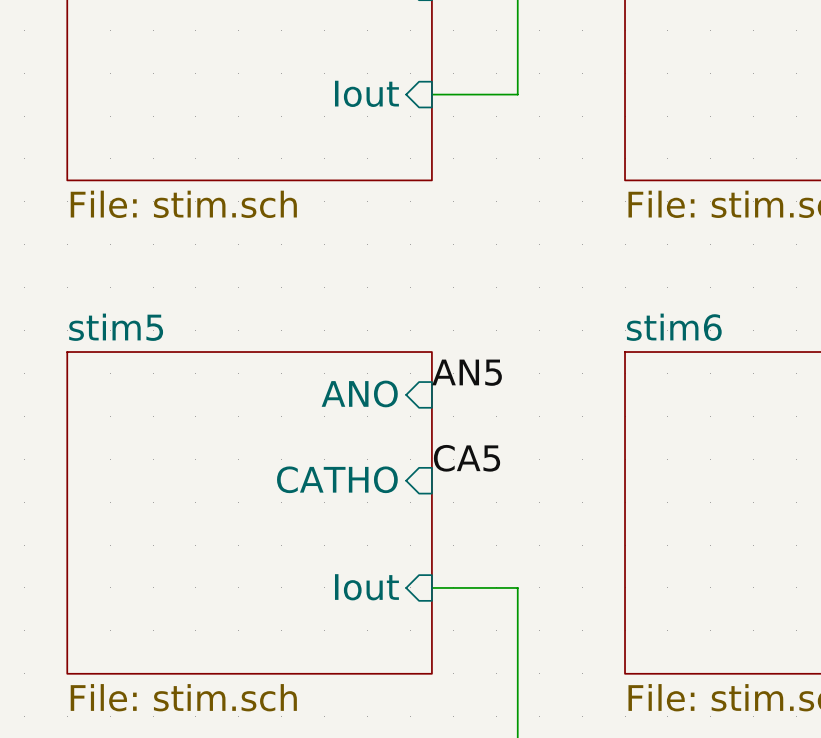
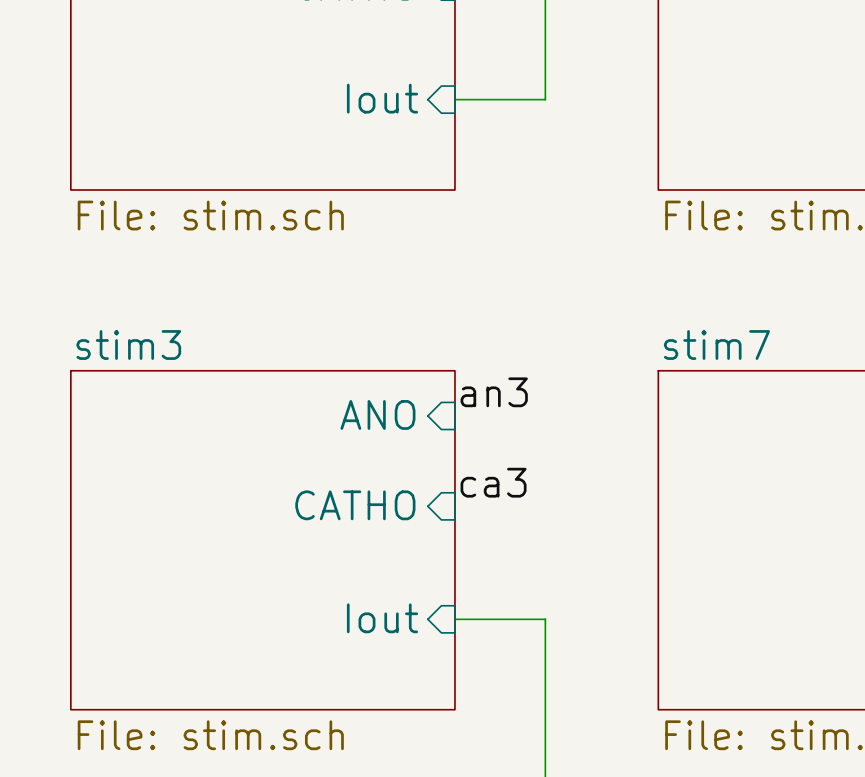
sheet stim5 name: stim5 (116, 327) -> stim3 (128, 345)
sheet stim6 name: stim6 (674, 327) -> stim7 (716, 345)
label: AN5 (467, 372) -> an3 (494, 392)
label: CA5 (467, 458) -> ca3 (493, 482)

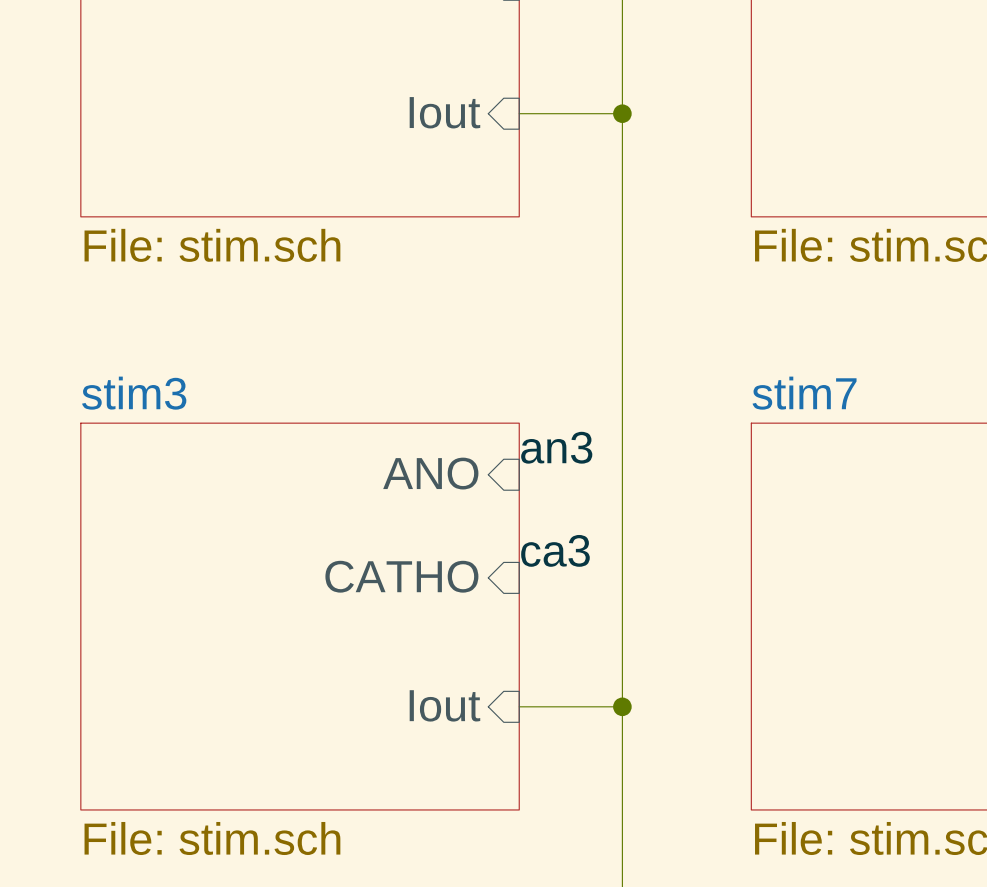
wire: none -> (622, 113) (622, 706)
junction: none -> (622, 113)
junction: none -> (622, 706)

